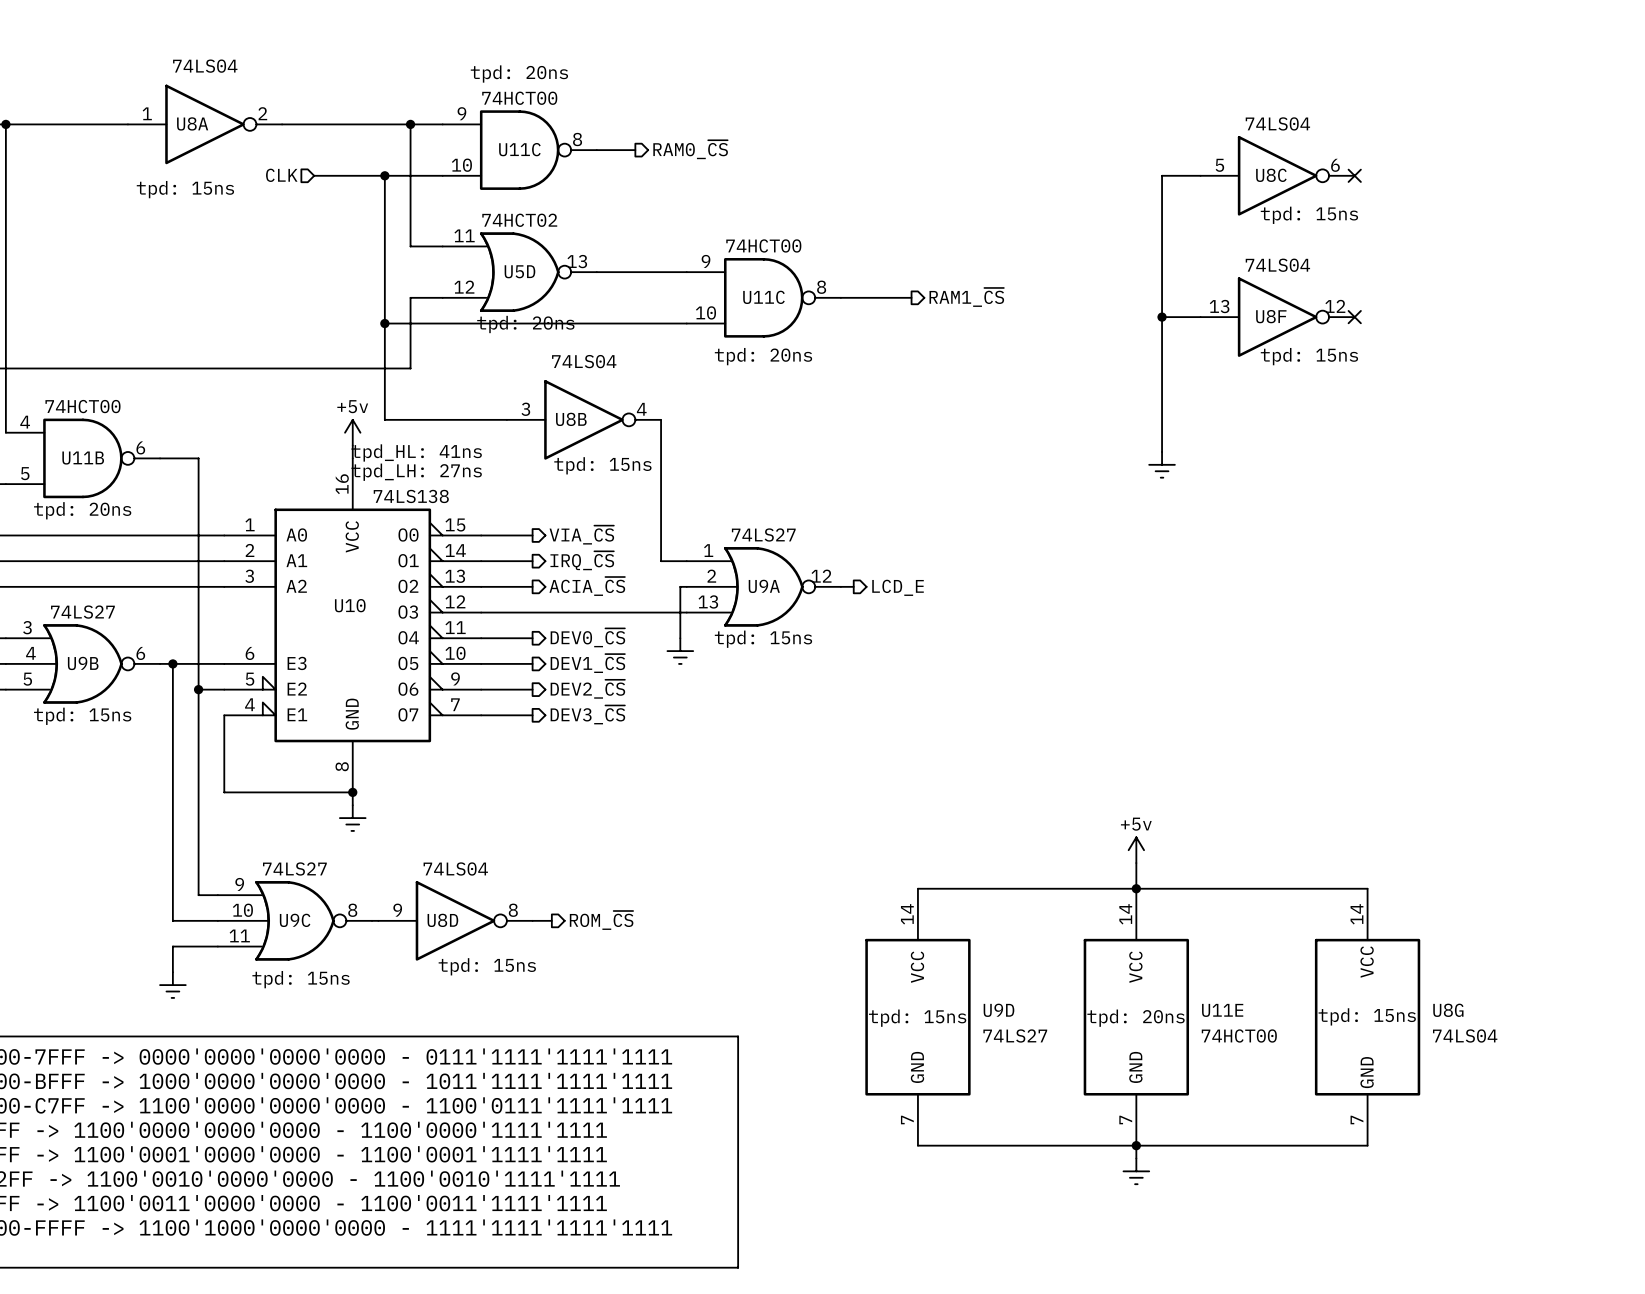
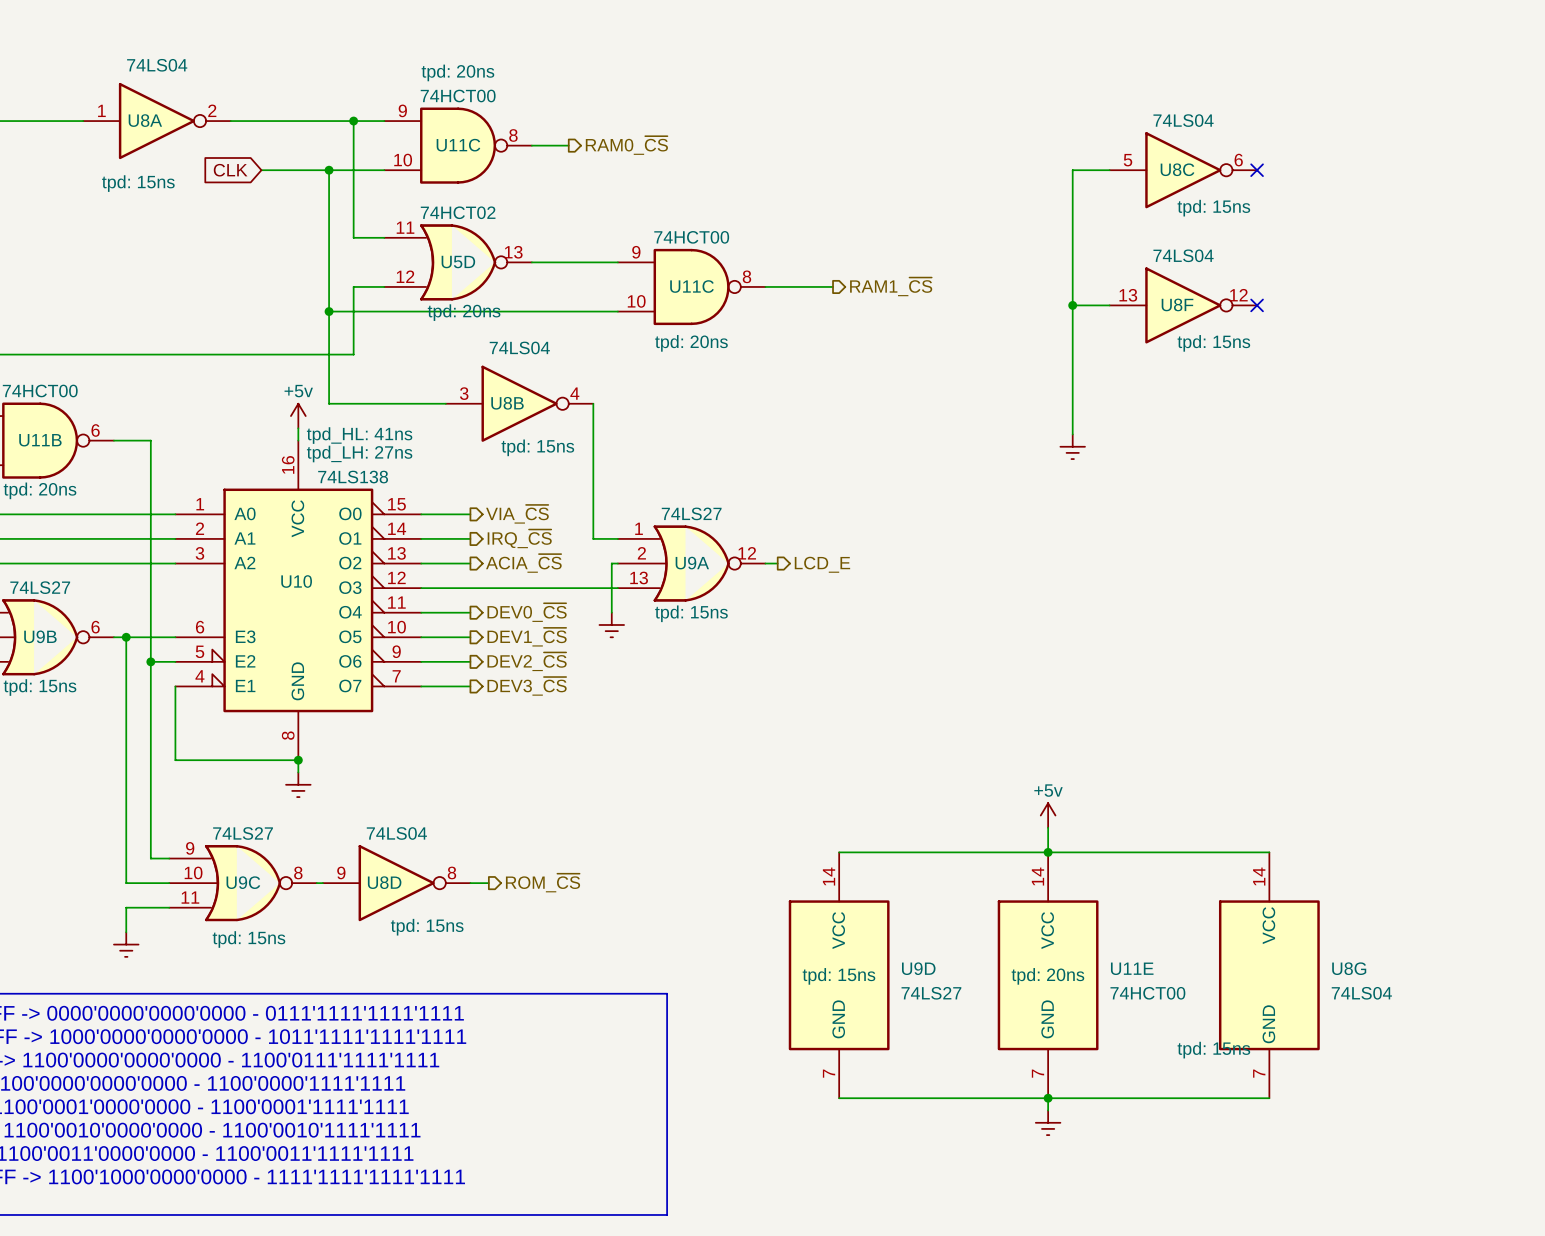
hierarchical label: CLK (281, 175) -> none
global label: none -> CLK (230, 170)
U8G text position: tpd: 15ns (1367, 1016) -> tpd: 15ns (1213, 1050)

